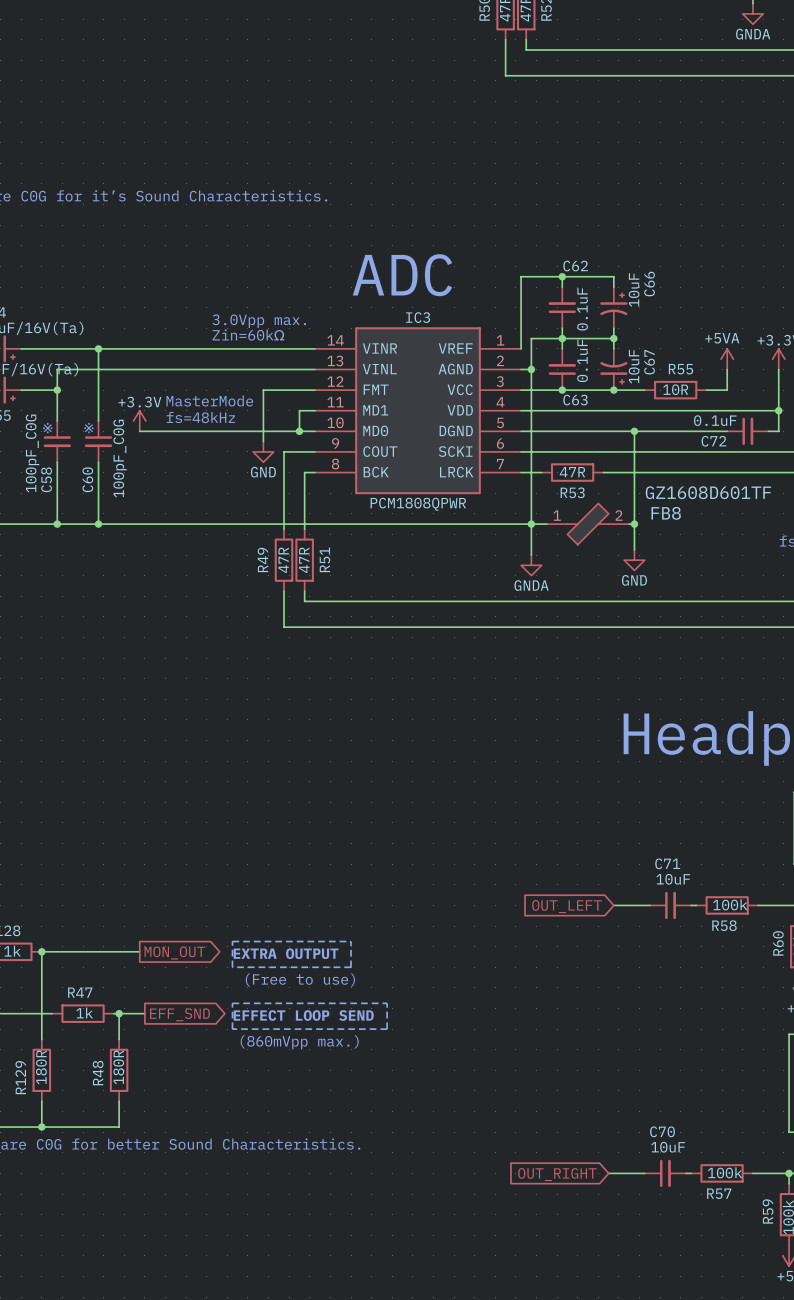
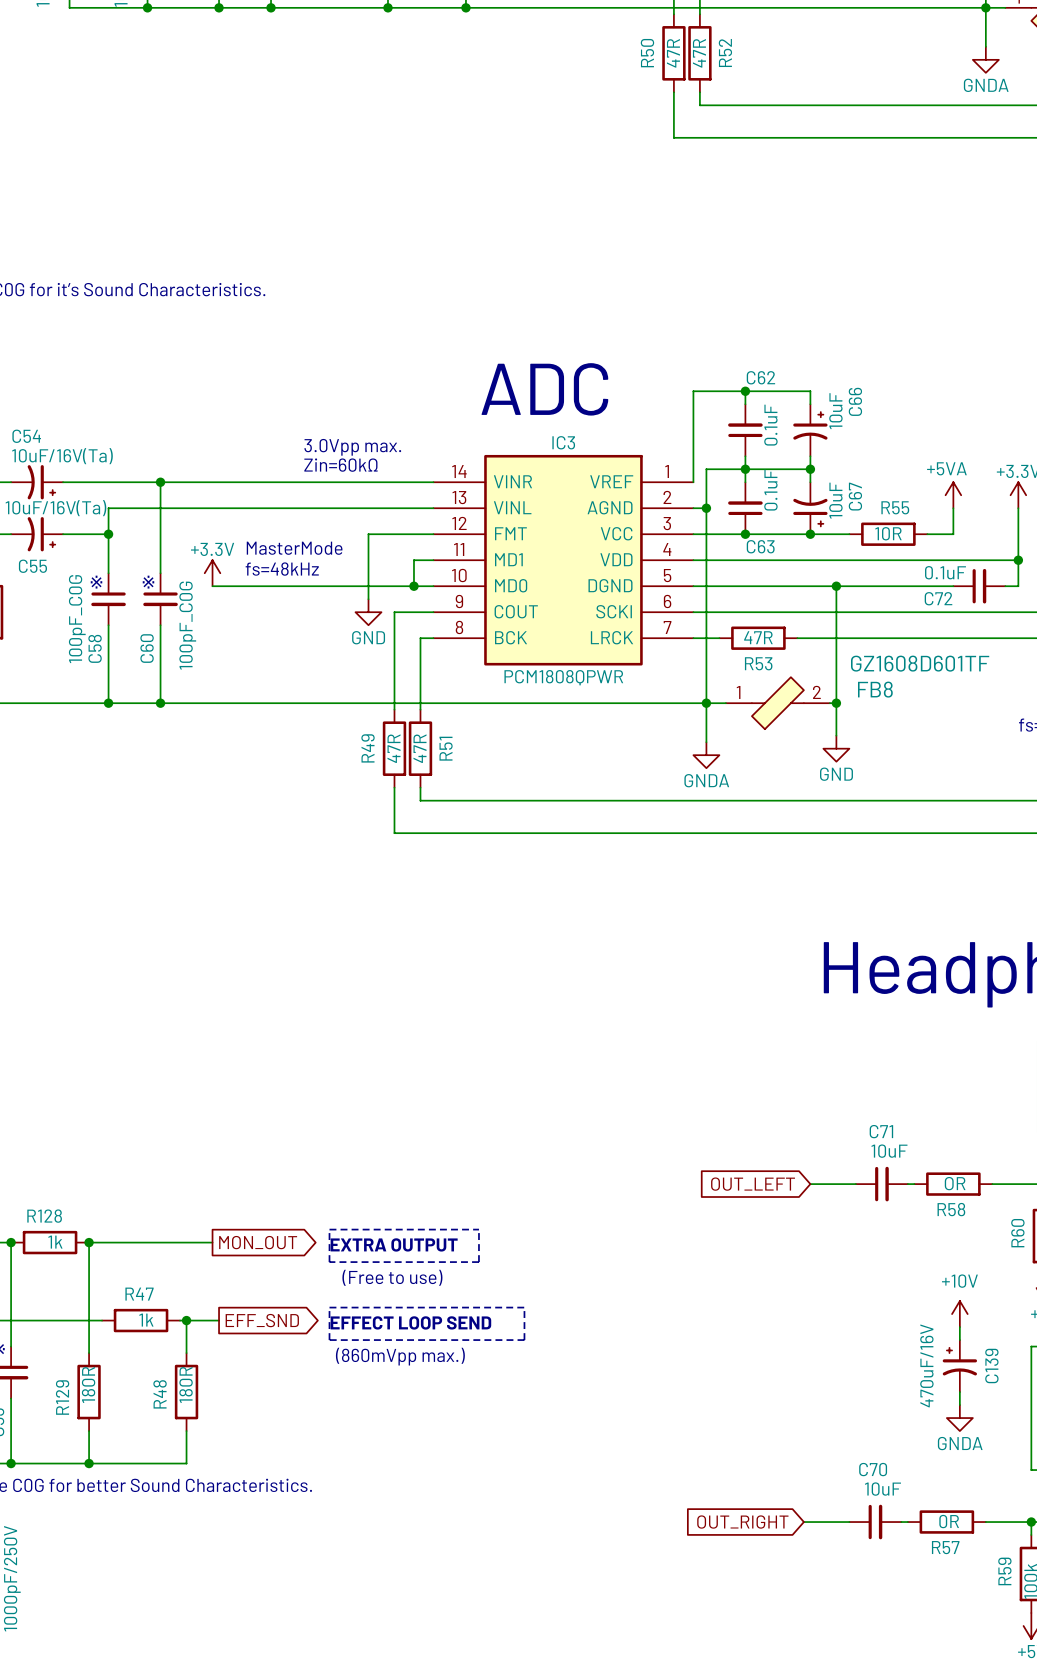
R58 value: 100k (730, 904) -> OR (955, 1183)
power symbol: none -> +10V (959, 1314)
wire: none -> (959, 1327) (959, 1340)
C139: none -> 470uF/16V (959, 1366)
wire: none -> (959, 1392) (959, 1405)
power symbol: none -> GNDA (959, 1418)
R57 value: 100k (725, 1172) -> 0R (949, 1521)

